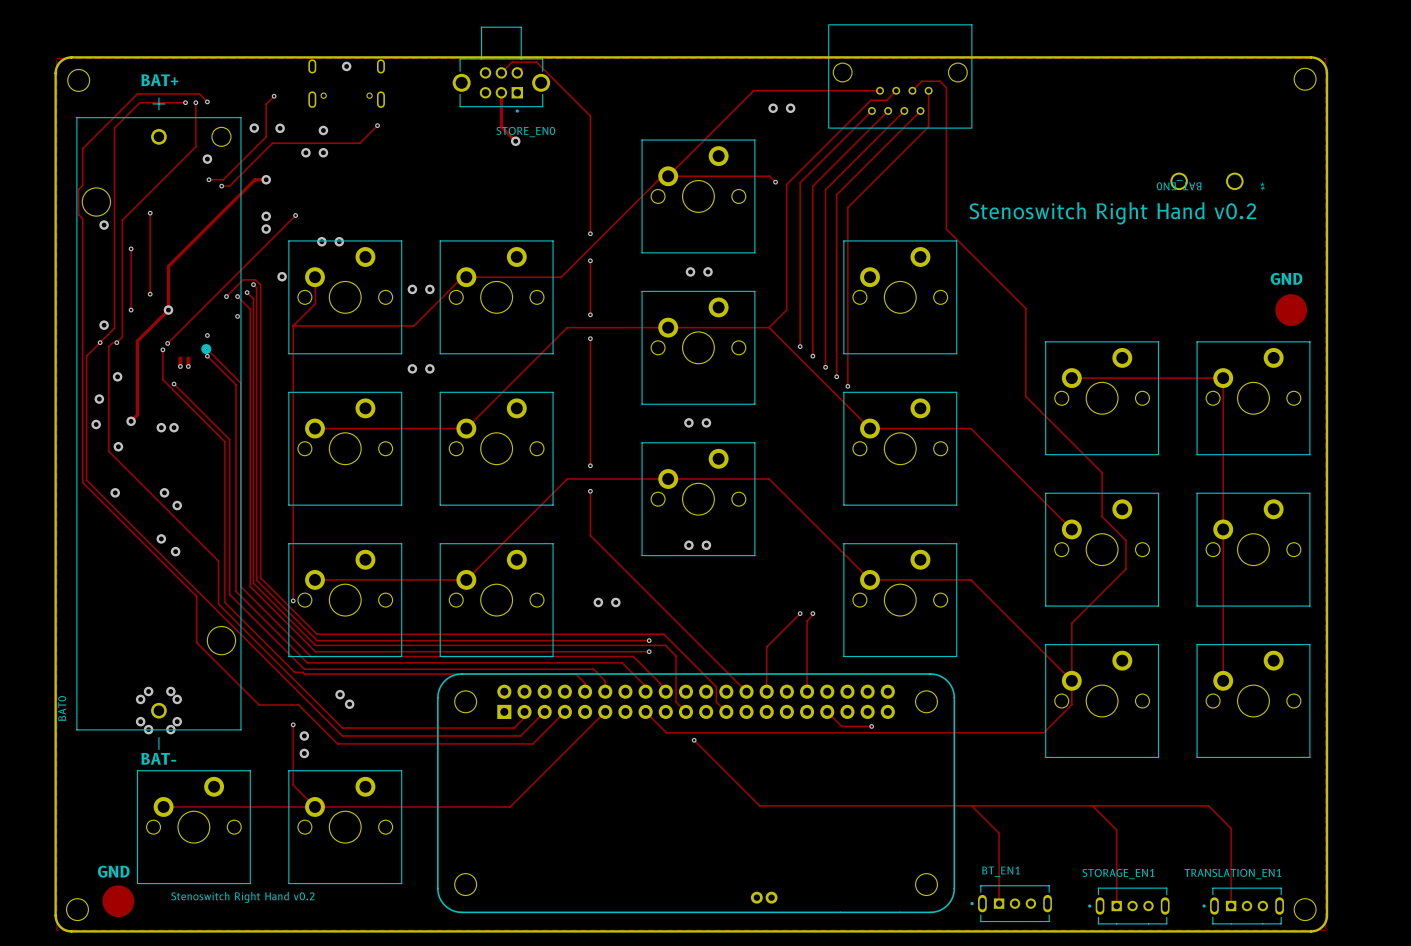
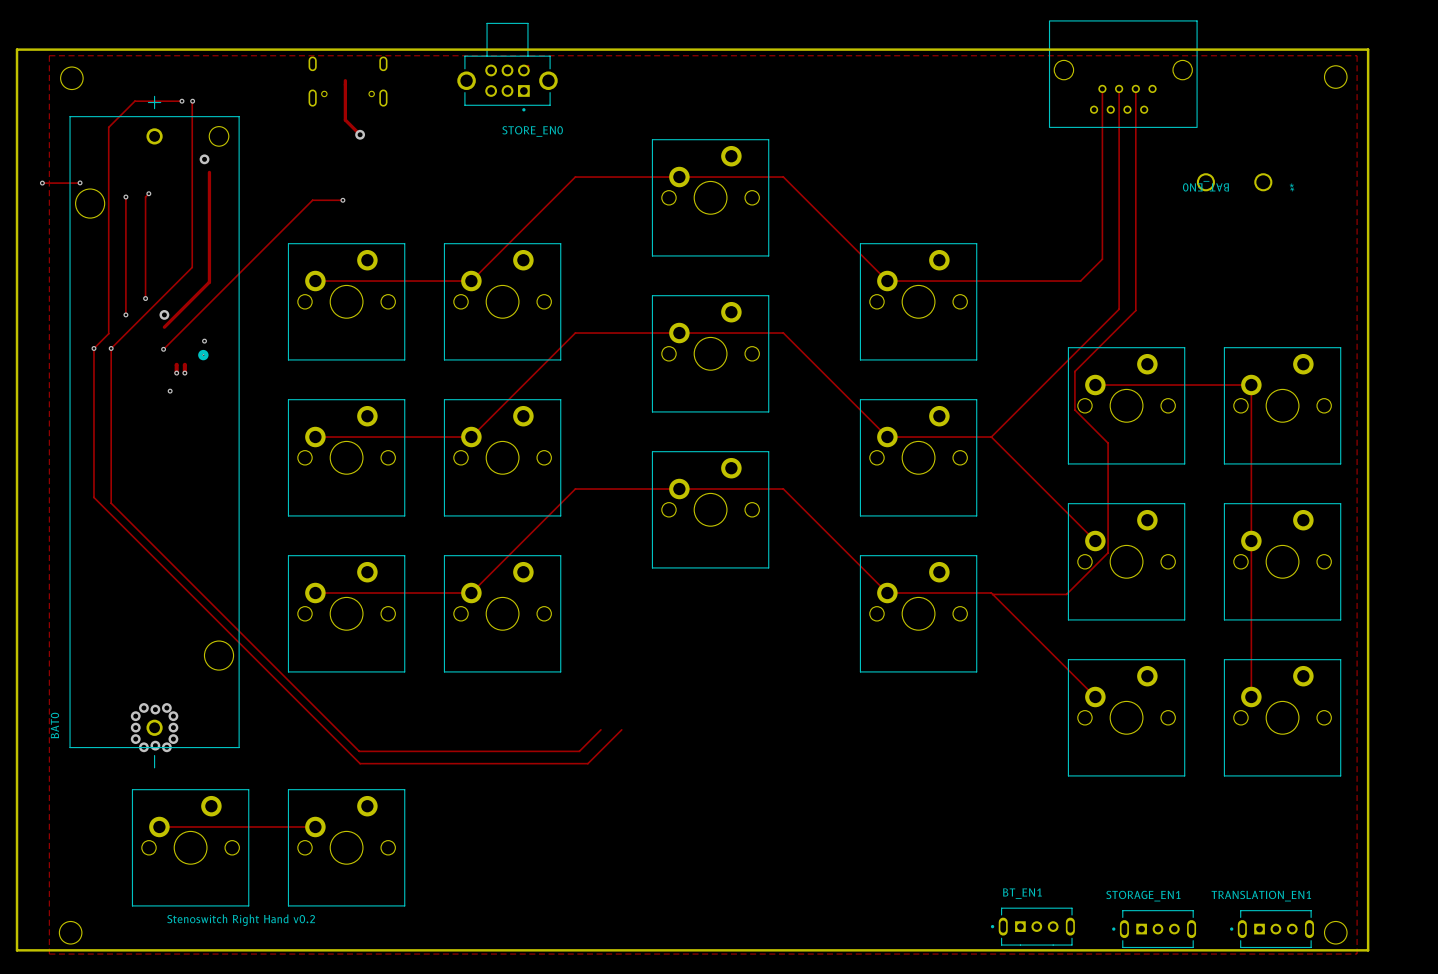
board edge: (71, 57) (1311, 57) (1319, 59) (1324, 64) (1326, 73) (1326, 915) (1324, 924) (1319, 929) (1311, 931) (71, 931) (63, 929) (58, 924) (55, 915) (55, 73) (60, 62) (71, 57) -> (17, 49) (17, 950) (1368, 950) (1368, 49) (17, 49)
via: (346, 66) -> none
track: (501, 72) (512, 62) (536, 62) (590, 115) (590, 233) -> none
part position: (900, 76) -> (1123, 74)
text: BAT+ (159, 80) -> none
track: (501, 88) (501, 126) (515, 141) -> (345, 80) (345, 120) (360, 134)
track: (880, 90) (753, 90) (668, 176) -> none
track: (896, 90) (886, 100) -> none
track: (912, 90) (921, 81) (940, 81) (946, 87) (946, 229) (1025, 308) (1025, 396) (1102, 472) (1102, 516) (1125, 540) (1125, 569) (1071, 623) (1071, 704) (1043, 732) (666, 732) (645, 711) -> none
track: (928, 90) (928, 127) (847, 207) (847, 386) -> none
track: none -> (1119, 88) (1119, 309) (991, 437)
track: none -> (1135, 88) (1135, 310) (1074, 371) (1074, 409) (1108, 443) (1108, 552) (1066, 594) (992, 594)
track: (274, 96) (266, 104) (266, 136) (223, 179) (208, 179) -> none
via: (274, 96) -> none
track: (886, 100) (870, 100) (786, 184) (786, 310) (769, 327) -> none
track: (207, 101) (199, 93) (137, 93) (82, 148) (82, 185) (78, 189) (78, 214) (82, 218) (82, 482) (196, 596) (196, 642) (259, 704) (298, 704) (337, 743) (532, 743) (564, 711) -> none
via: (207, 101) -> none
track: (195, 102) (195, 146) (122, 220) (122, 337) -> (192, 101) (192, 267) (116, 342)
via: (773, 108) -> none
via: (790, 108) -> none
track: (871, 110) (800, 182) (800, 346) -> none
track: (888, 110) (812, 186) -> none
track: (904, 110) (825, 189) (825, 367) -> none
track: (920, 110) (836, 194) (836, 376) -> none
track: (377, 125) (359, 143) (272, 143) (229, 186) (221, 186) -> none
via: (377, 125) -> none
via: (254, 128) -> none
via: (280, 128) -> none
via: (323, 130) -> none
via: none -> (360, 134)
via: (515, 141) -> none
via: (305, 152) -> none
via: (323, 152) -> none
track: none -> (209, 172) (209, 282) (164, 327)
track: (662, 176) (561, 277) (466, 277) -> (673, 177) (575, 177) (471, 281)
track: (769, 176) (775, 182) -> (783, 177) (887, 281) (1080, 281) (1102, 259) (1102, 88)
via: (208, 179) -> none
via: (266, 179) -> none
track: (269, 179) (255, 179) (168, 266) (168, 310) (137, 341) (137, 414) (131, 421) -> none
track: none -> (80, 182) (42, 183)
via: none -> (80, 182)
via: none -> (42, 183)
via: (775, 182) -> none
via: (221, 186) -> none
track: (812, 186) (812, 356) -> none
track: none -> (148, 193) (145, 197) (145, 215)
via: none -> (148, 193)
track: none -> (125, 197) (125, 251)
via: none -> (125, 197)
track: none -> (342, 200) (312, 200) (295, 217)
via: none -> (342, 200)
via: (150, 213) -> none
text: Stenoswitch Right Hand v0.2 (1112, 213) -> none
via: (295, 215) -> none
via: (266, 216) -> none
via: (104, 225) -> none
via: (266, 229) -> none
via: (590, 233) -> none
via: (321, 241) -> none
via: (339, 241) -> none
via: (131, 248) -> none
track: (590, 260) (590, 314) -> none
via: (590, 260) -> none
via: (690, 271) -> none
via: (707, 271) -> none
via: (282, 276) -> none
track: (314, 277) (315, 303) (293, 326) -> (315, 281) (467, 281)
track: (462, 277) (413, 325) (293, 325) (293, 600) -> none
text: GND (1286, 278) -> none
track: (253, 284) (256, 287) (256, 580) (317, 640) (649, 640) -> none
via: (253, 284) -> none
via: (412, 289) -> none
via: (429, 289) -> none
track: (247, 292) (253, 298) (253, 583) (315, 645) (665, 645) (676, 655) (676, 701) (685, 711) -> none
via: (247, 292) -> none
track: (226, 296) (243, 279) (255, 279) (260, 285) (260, 577) (317, 634) (663, 634) (716, 686) (716, 701) (726, 711) -> none
via: (226, 296) -> none
track: (237, 296) (250, 309) (250, 586) (315, 651) (649, 651) -> none
via: (237, 296) -> none
part: (1291, 310) -> none
via: (590, 314) -> none
via: (237, 316) -> none
via: (104, 325) -> none
track: (590, 338) (590, 465) -> none
via: (590, 338) -> none
track: (100, 342) (86, 356) (86, 480) (342, 735) (520, 735) (544, 711) -> (93, 348) (93, 497) (360, 763) (587, 763) (621, 729)
track: (116, 342) (112, 342) (108, 346) (108, 451) (218, 561) (218, 604) (342, 728) (514, 728) (524, 717) (524, 711) -> (111, 348) (111, 503) (359, 751) (579, 751) (600, 729)
via: (800, 346) -> none
track: (162, 349) (162, 379) (224, 441) (224, 602) (294, 672) (304, 674) (575, 674) (585, 683) (585, 691) -> none
via: (162, 349) -> none
track: (207, 349) (240, 382) (240, 586) (310, 656) (633, 656) (665, 689) (665, 691) -> none
track: (207, 356) (236, 384) (236, 591) (307, 662) (622, 662) (645, 686) (645, 691) -> none
via: (207, 356) -> none
via: (812, 356) -> none
via: (825, 367) -> none
via: (412, 368) -> none
via: (429, 368) -> none
via: (117, 376) -> none
via: (836, 376) -> none
track: (174, 384) (229, 439) (229, 594) (304, 669) (593, 669) (605, 680) (605, 691) -> none
via: (847, 386) -> none
via: (99, 399) -> none
via: (131, 421) -> none
via: (688, 422) -> none
via: (706, 422) -> none
via: (96, 424) -> none
via: (161, 427) -> none
via: (174, 427) -> none
via: (118, 446) -> none
via: (590, 465) -> none
track: (590, 491) (590, 535) (746, 691) -> none
via: (590, 491) -> none
via: (115, 492) -> none
via: (164, 492) -> none
via: (177, 505) -> none
via: (161, 538) -> none
via: (688, 545) -> none
via: (706, 545) -> none
via: (175, 551) -> none
via: (293, 600) -> none
via: (598, 602) -> none
via: (615, 602) -> none
track: (800, 613) (766, 647) (766, 691) -> none
via: (800, 613) -> none
track: (812, 613) (807, 621) (807, 691) -> none
via: (812, 613) -> none
via: (649, 640) -> none
via: (649, 651) -> none
via: none -> (155, 709)
via: (340, 694) -> none
via: (349, 704) -> none
via: none -> (135, 727)
via: none -> (173, 727)
track: (605, 711) (510, 806) (314, 806) (293, 785) (293, 724) -> none
track: (827, 711) (841, 726) (871, 726) -> none
via: (293, 724) -> none
via: (871, 726) -> none
via: none -> (155, 745)
via: (304, 735) -> none
track: (694, 740) (759, 805) (1208, 805) (1231, 828) (1231, 906) -> none
via: (694, 740) -> none
via: (304, 753) -> none
text: BAT- (158, 758) -> none
part: (696, 793) -> none
track: (1092, 805) (1116, 830) (1116, 906) -> none
track: (972, 806) (999, 833) (999, 903) -> none
text: GND (113, 871) -> none
part: (118, 901) -> none

